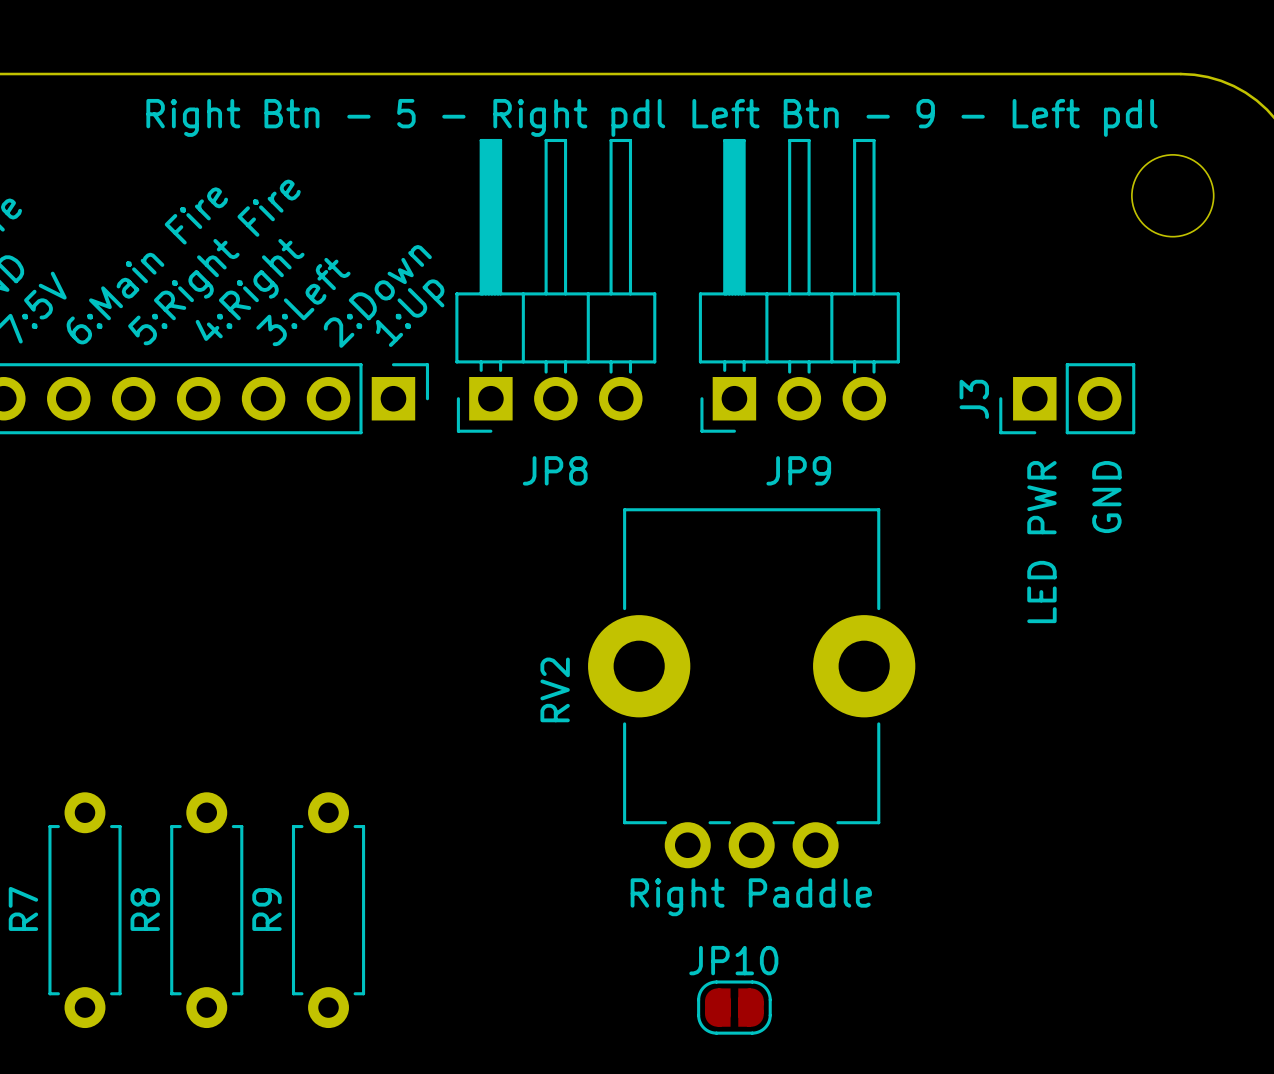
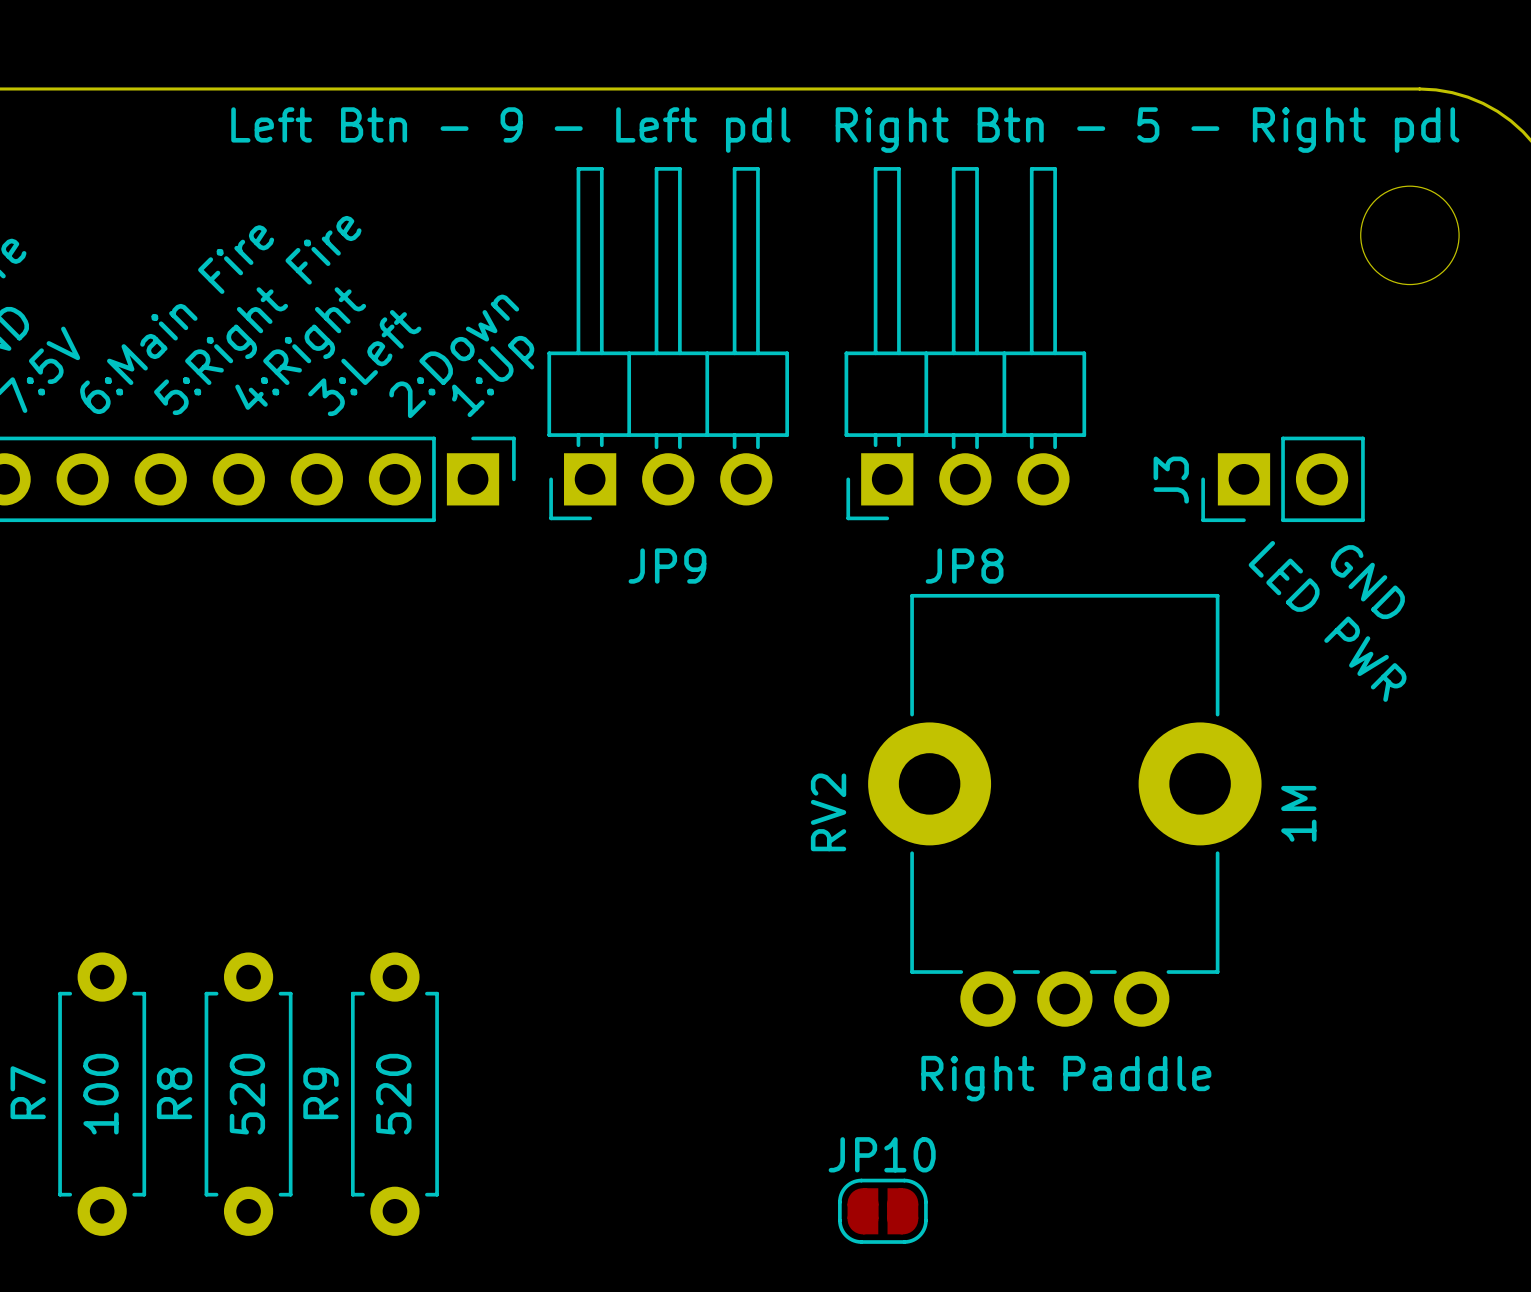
text position: Right Btn - 5 - Right pdl (405, 117) -> Right Btn - 5 - Right pdl (1147, 130)
text position: Left Btn - 9 - Left pdl (925, 117) -> Left Btn - 9 - Left pdl (510, 130)
JP8 footprint: [455, 138, 657, 433] -> [844, 167, 1087, 521]
JP9 footprint: [698, 138, 900, 433] -> [547, 167, 790, 521]
text rotation: 0° (1106, 497) -> 135° clockwise (1367, 582)
text rotation: 0° (1041, 542) -> 135° clockwise (1327, 621)
RV2 value: none -> 1M (1298, 813)
RV2 position: (751, 688) -> (1064, 810)
text position: Right Paddle (751, 897) -> Right Paddle (1066, 1078)
R7 value: none -> 100 (101, 1094)
R8 value: none -> 520 (247, 1094)
R9 value: none -> 520 (393, 1094)

